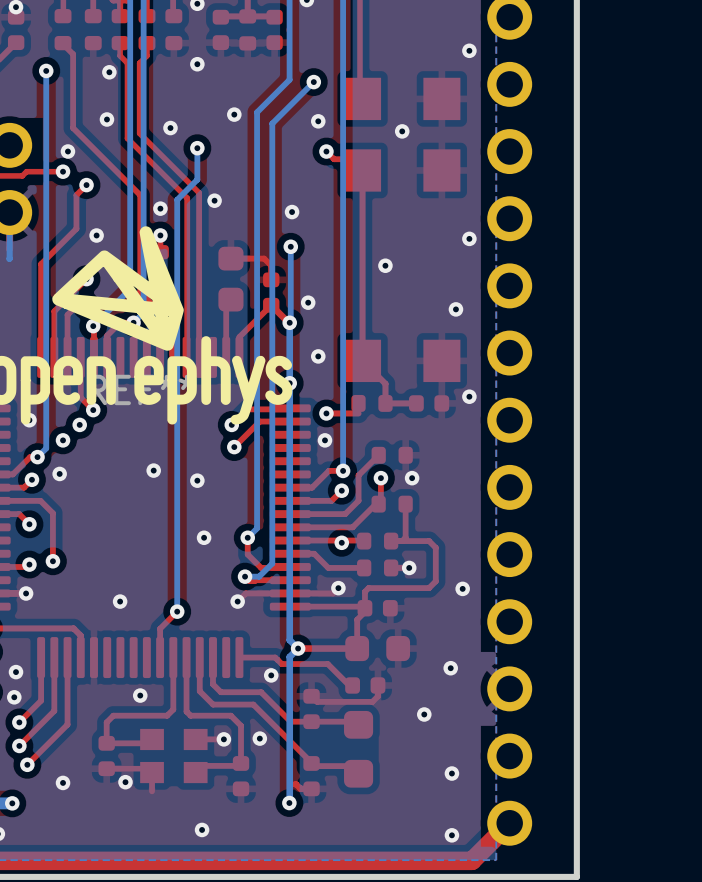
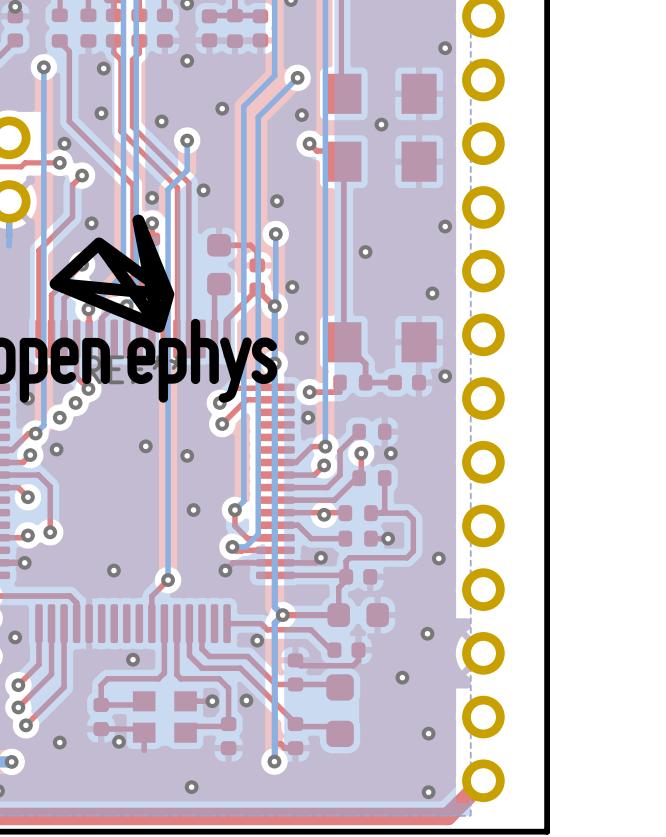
via: (14, 697) -> none

